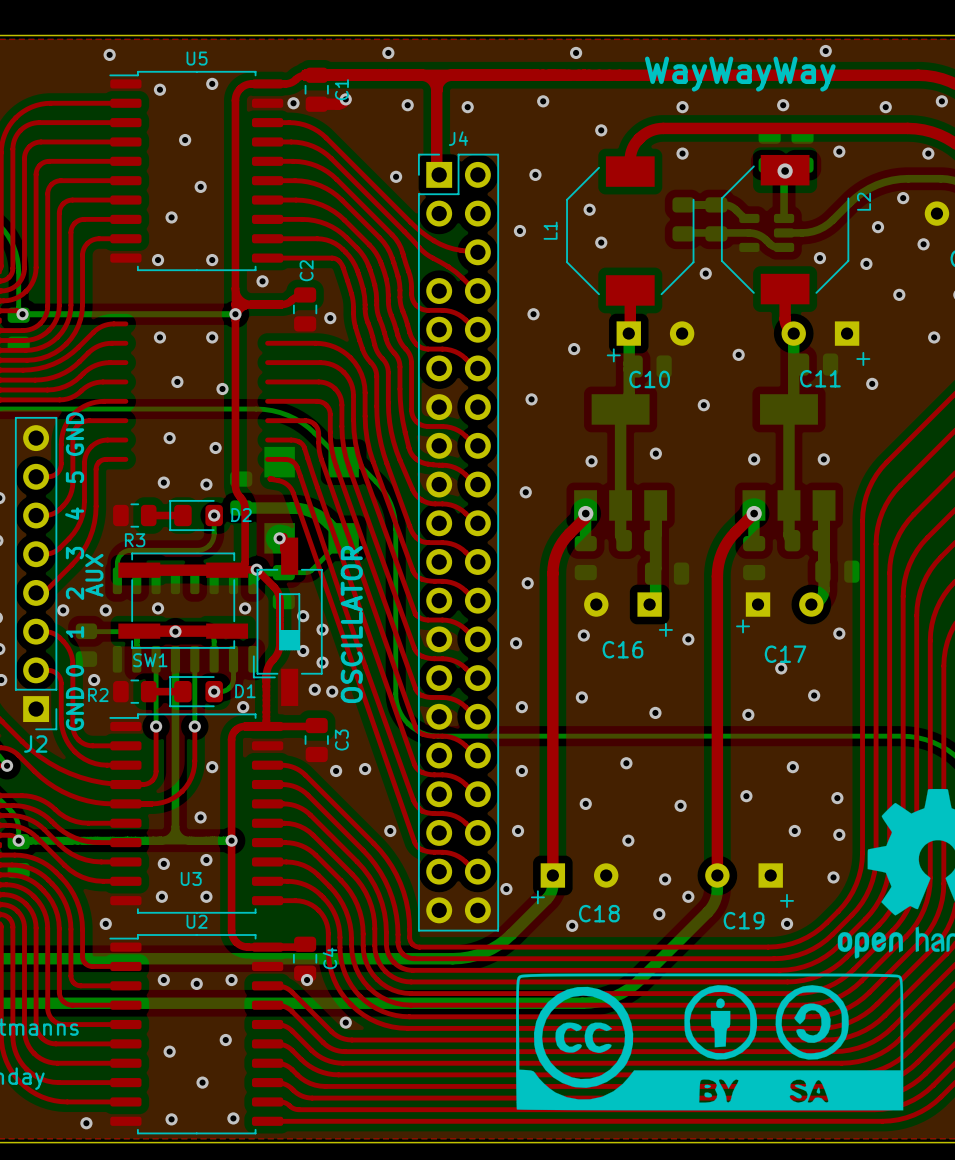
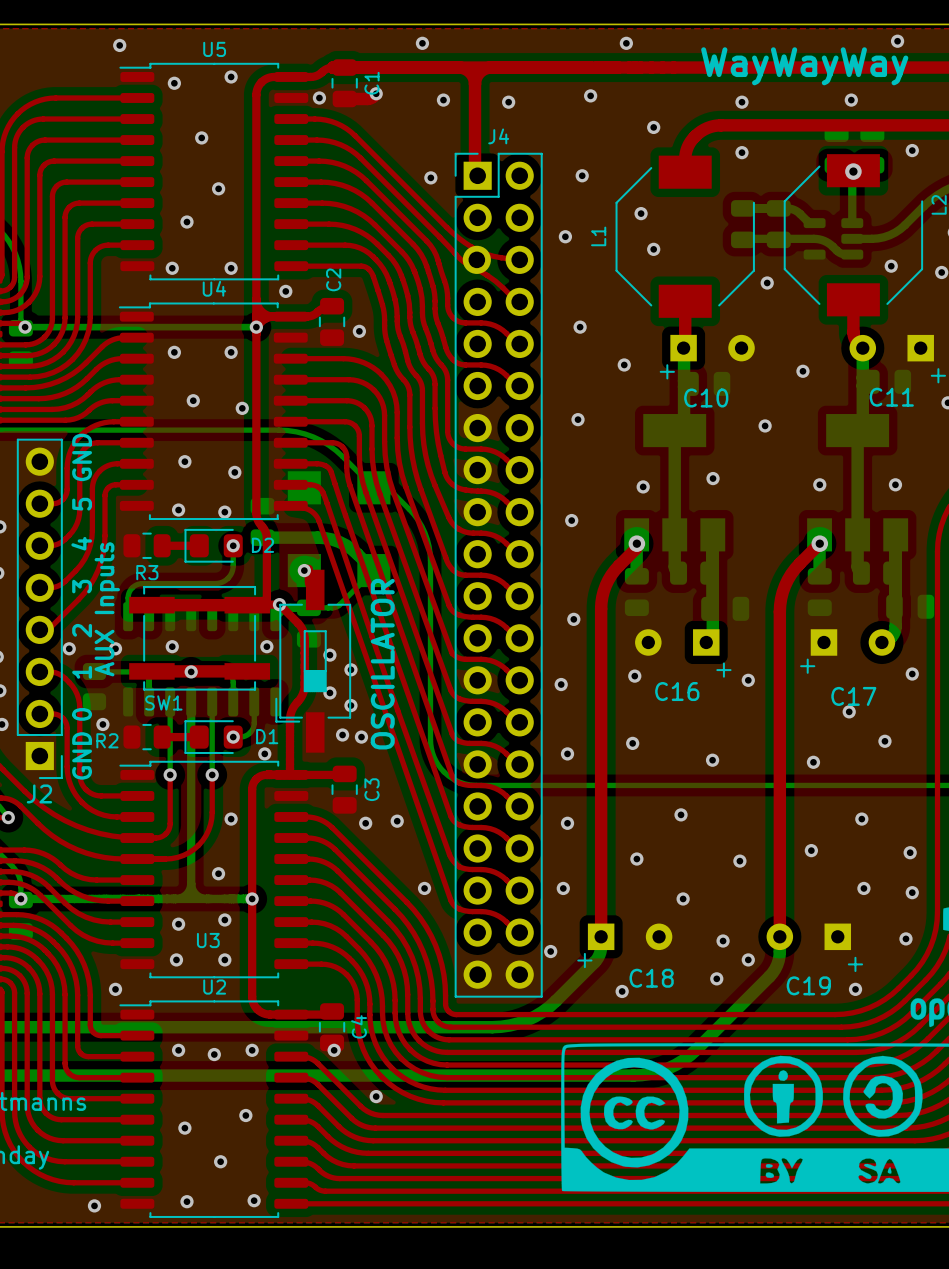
part: none -> (476, 259)
U4: none -> (213, 411)
text: none -> AUX Inputs (107, 609)
text: AUX (94, 575) -> none

